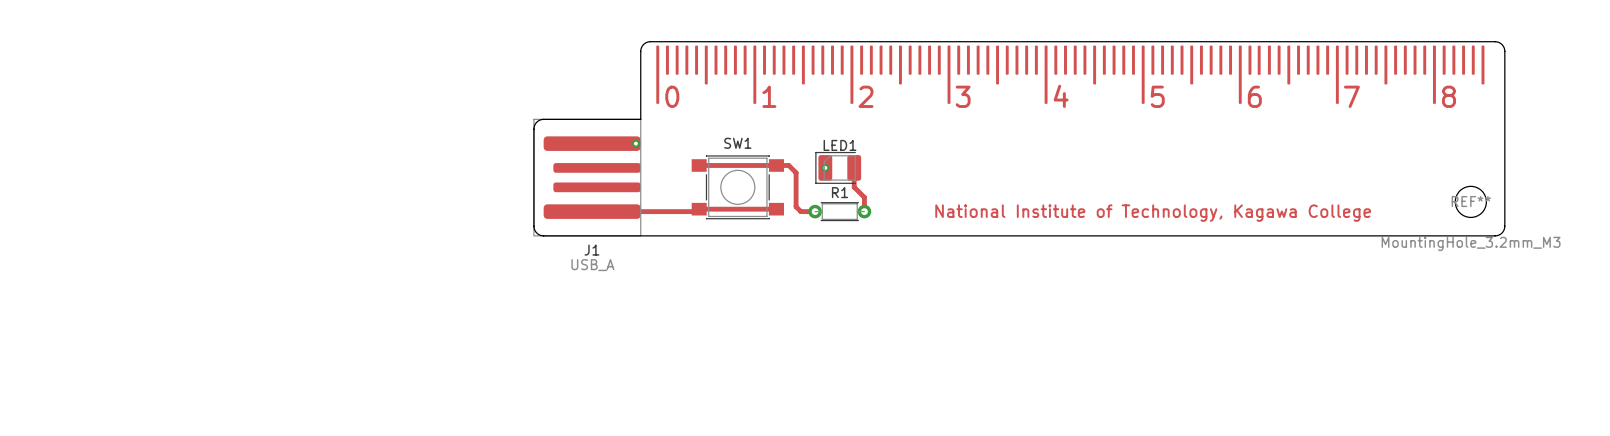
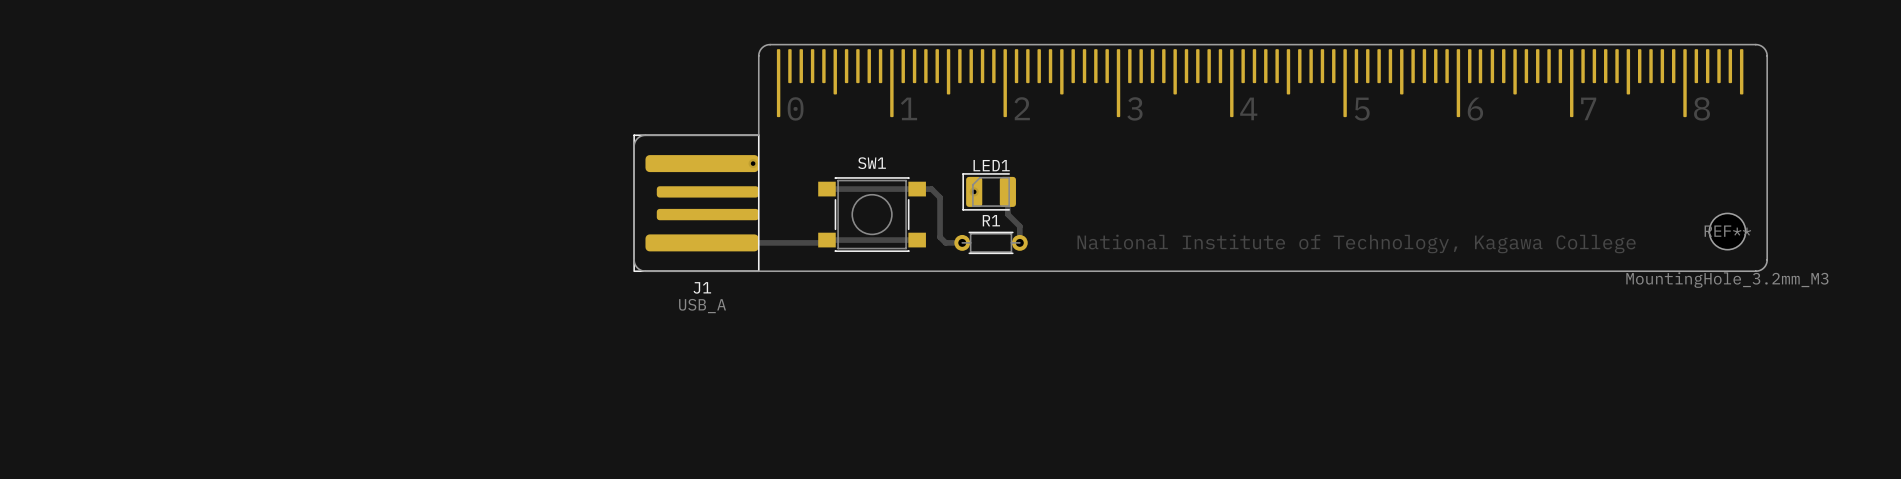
J1 footprint: [533, 118, 642, 237] -> [633, 134, 760, 272]

